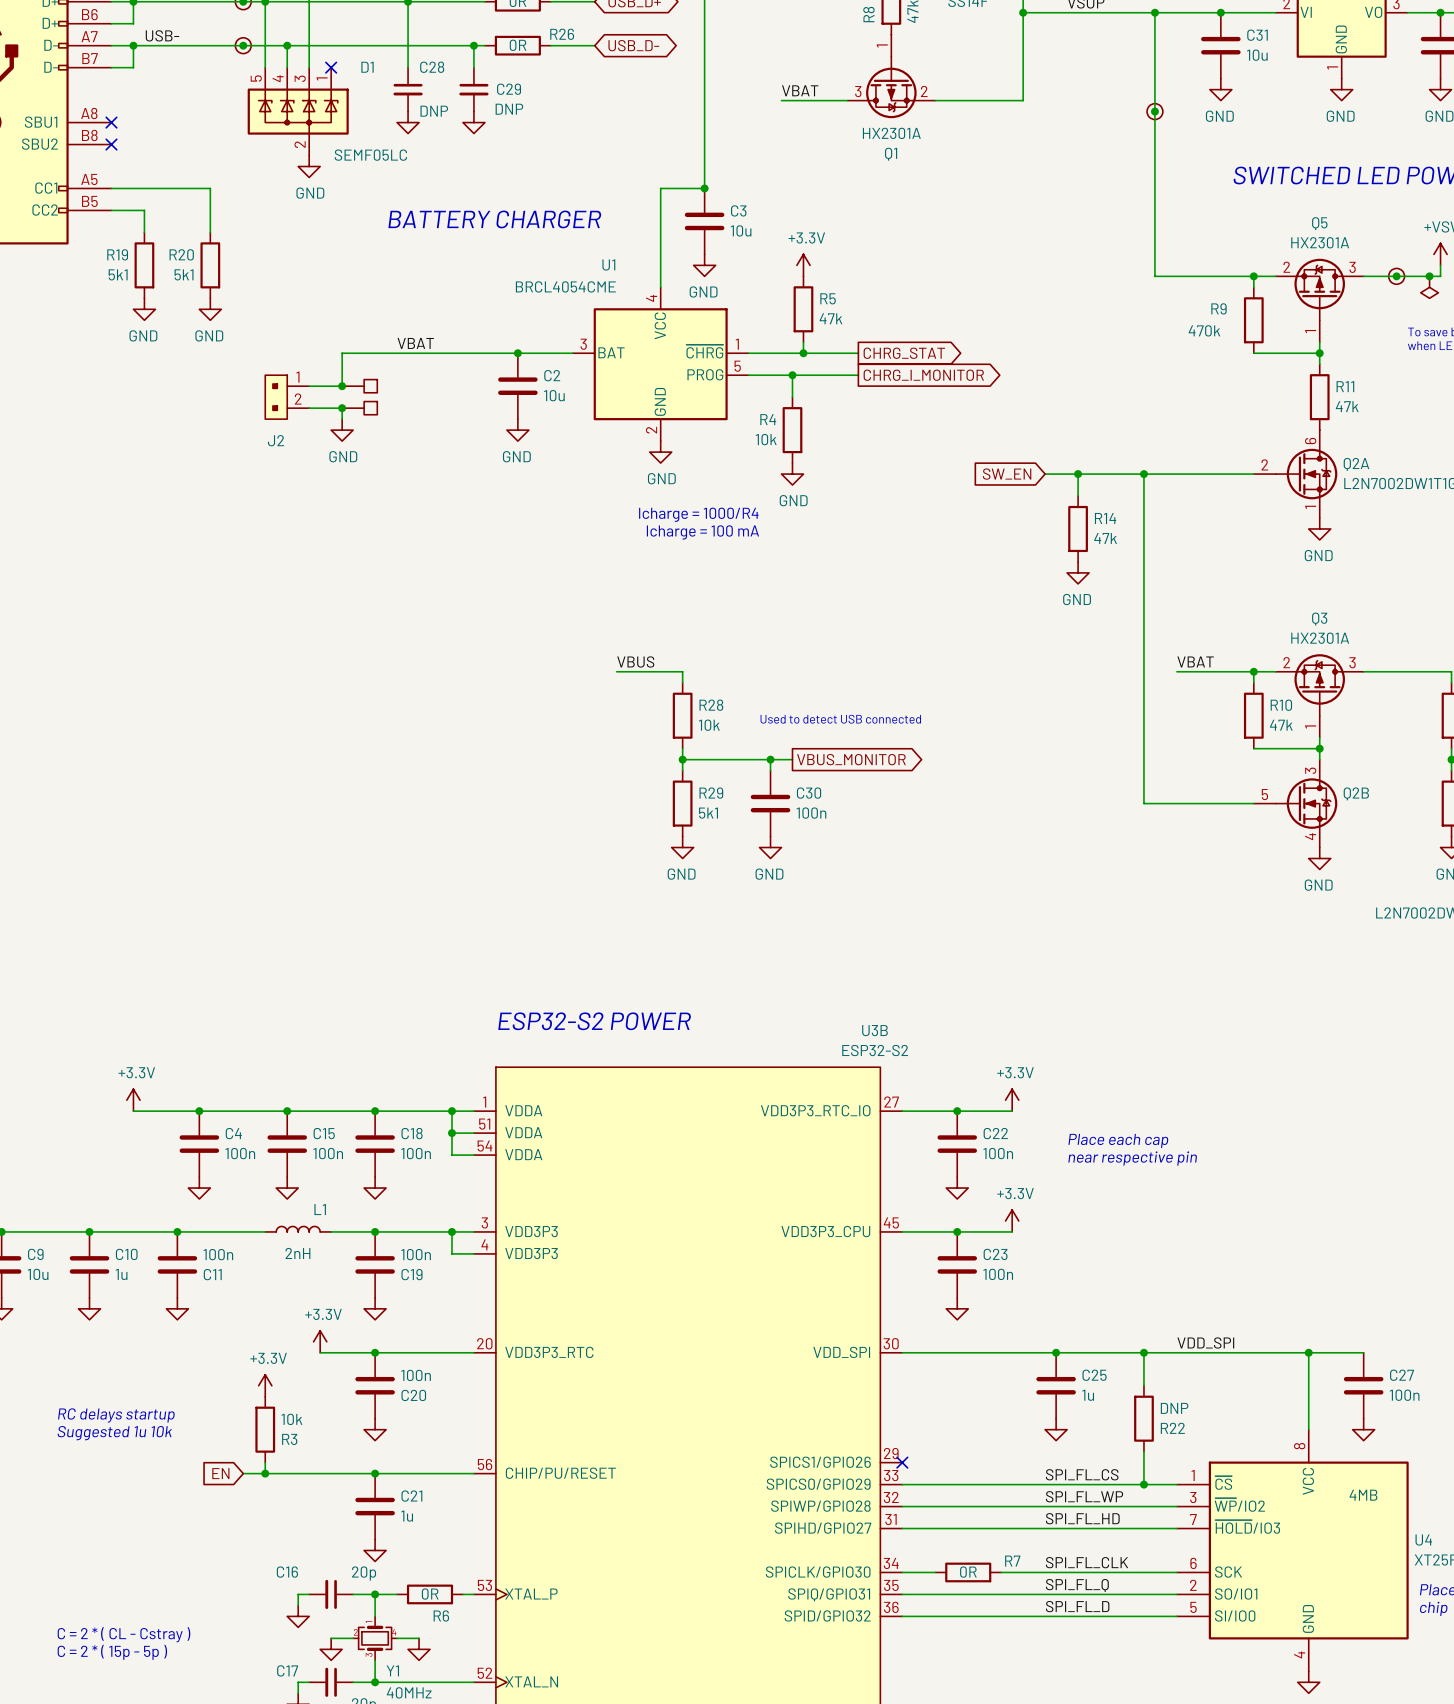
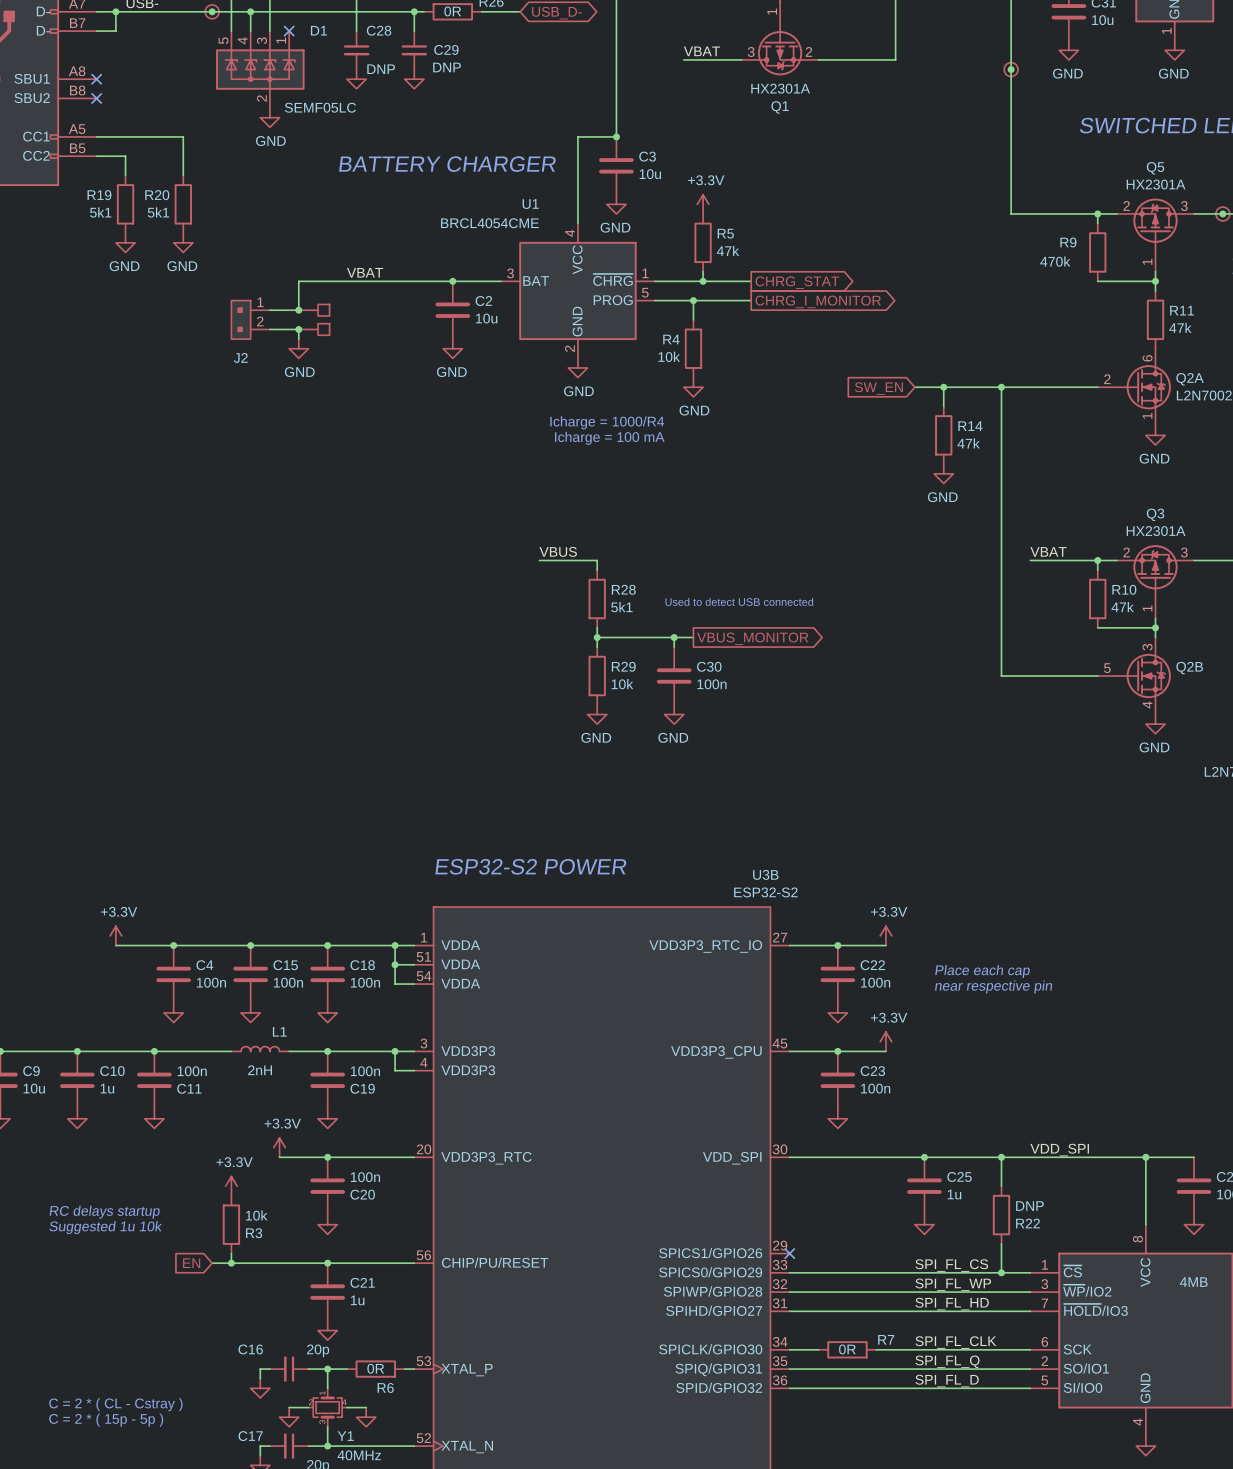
R28 value: 10k (709, 725) -> 5k1 (621, 607)
R29 value: 5k1 (708, 813) -> 10k (622, 684)

